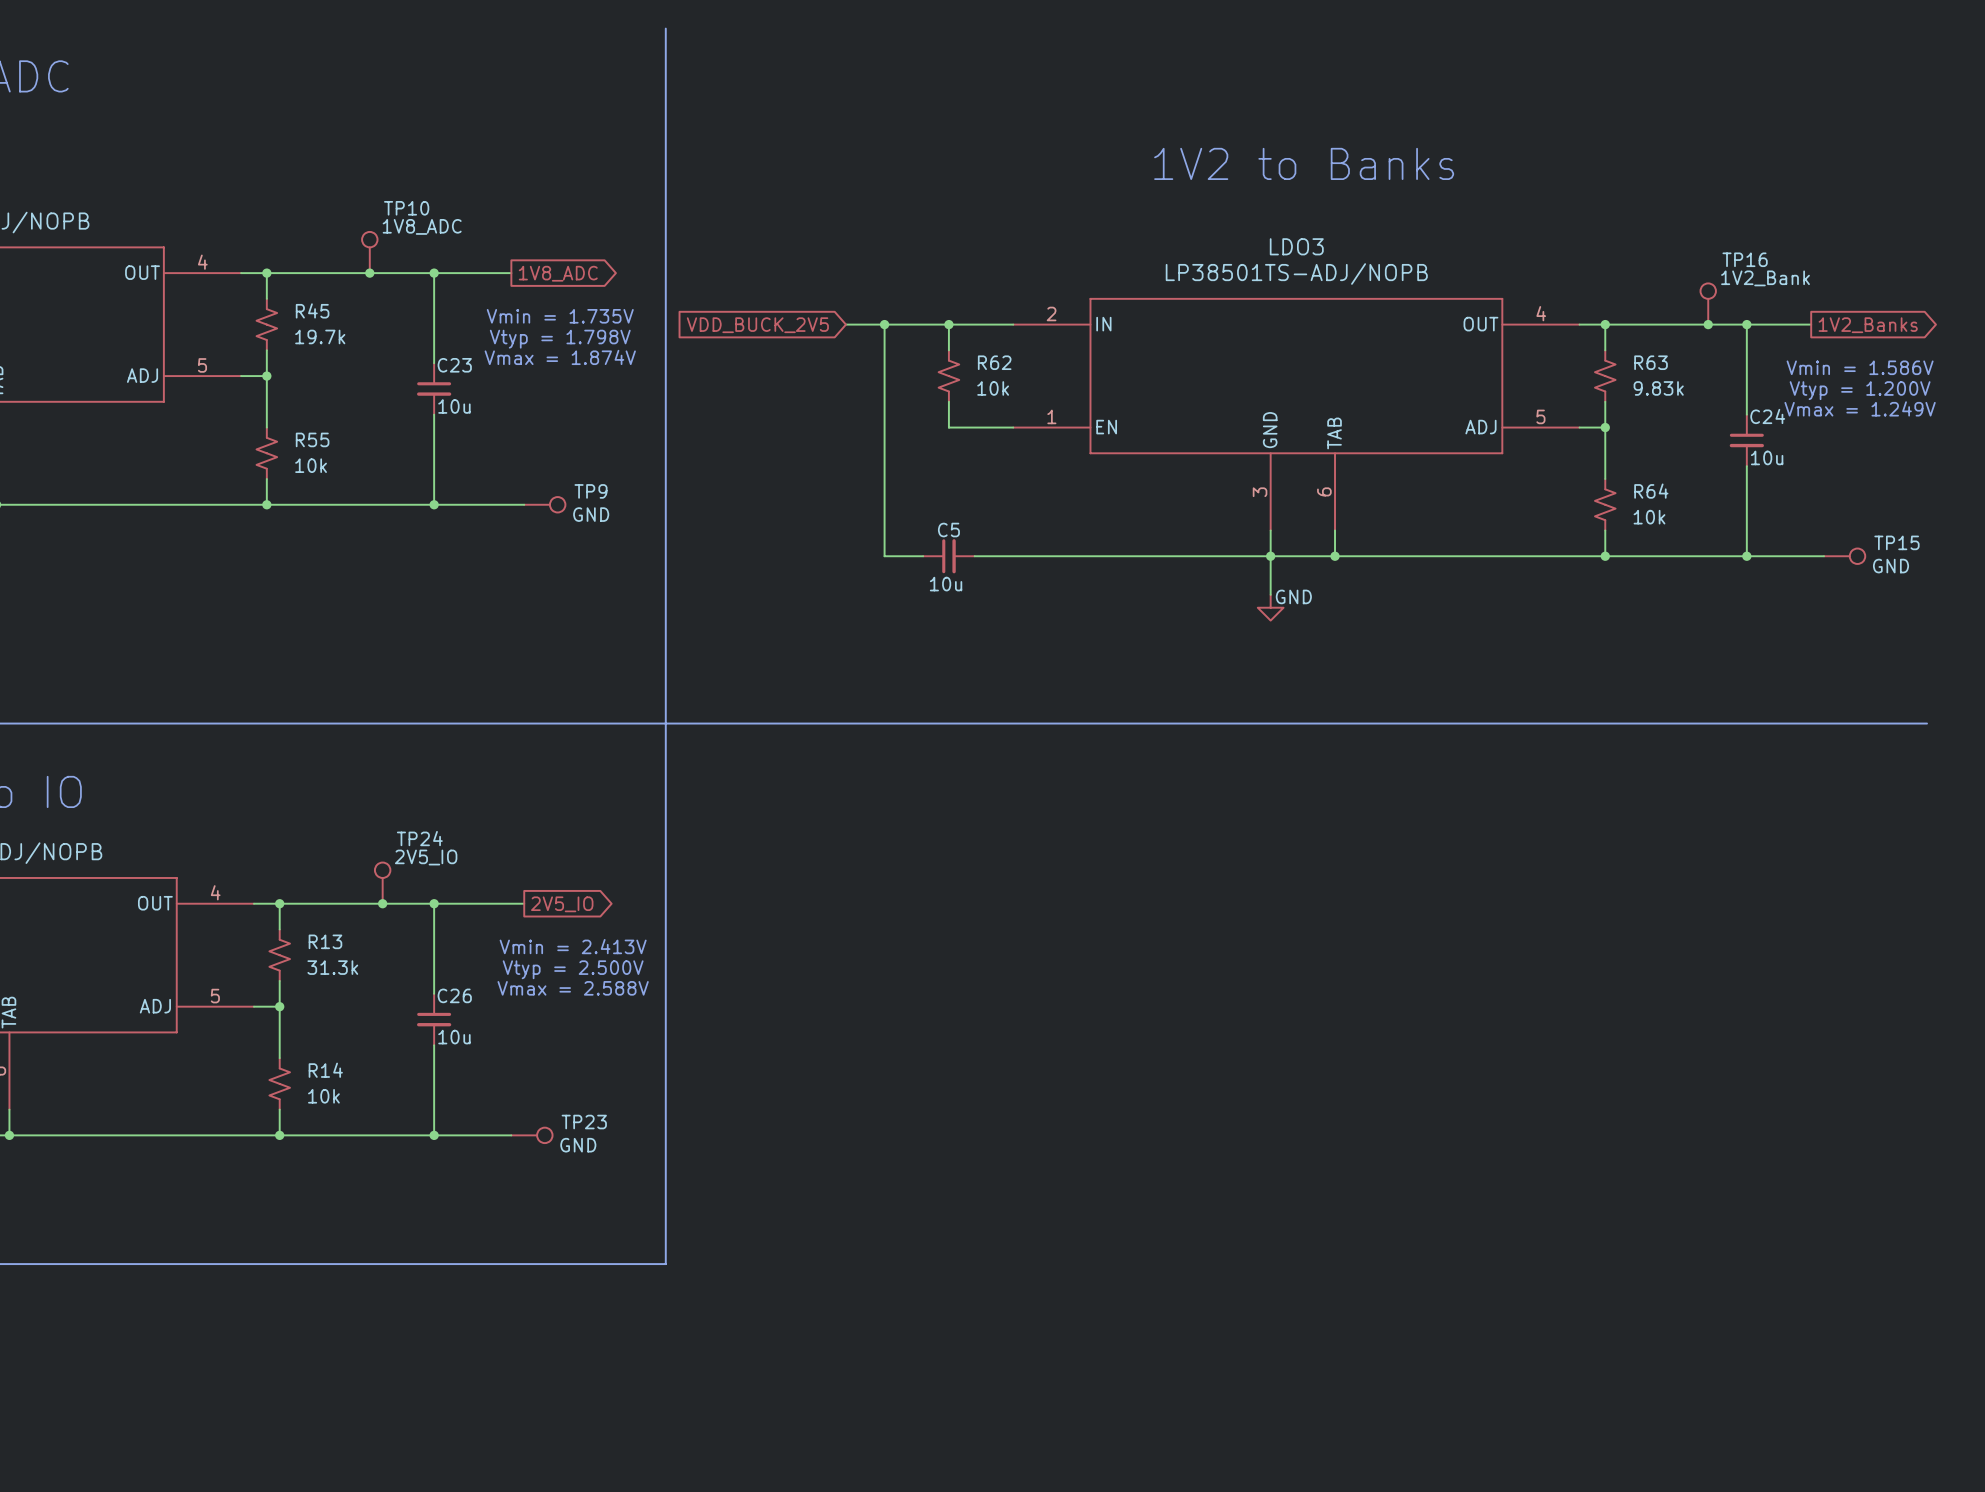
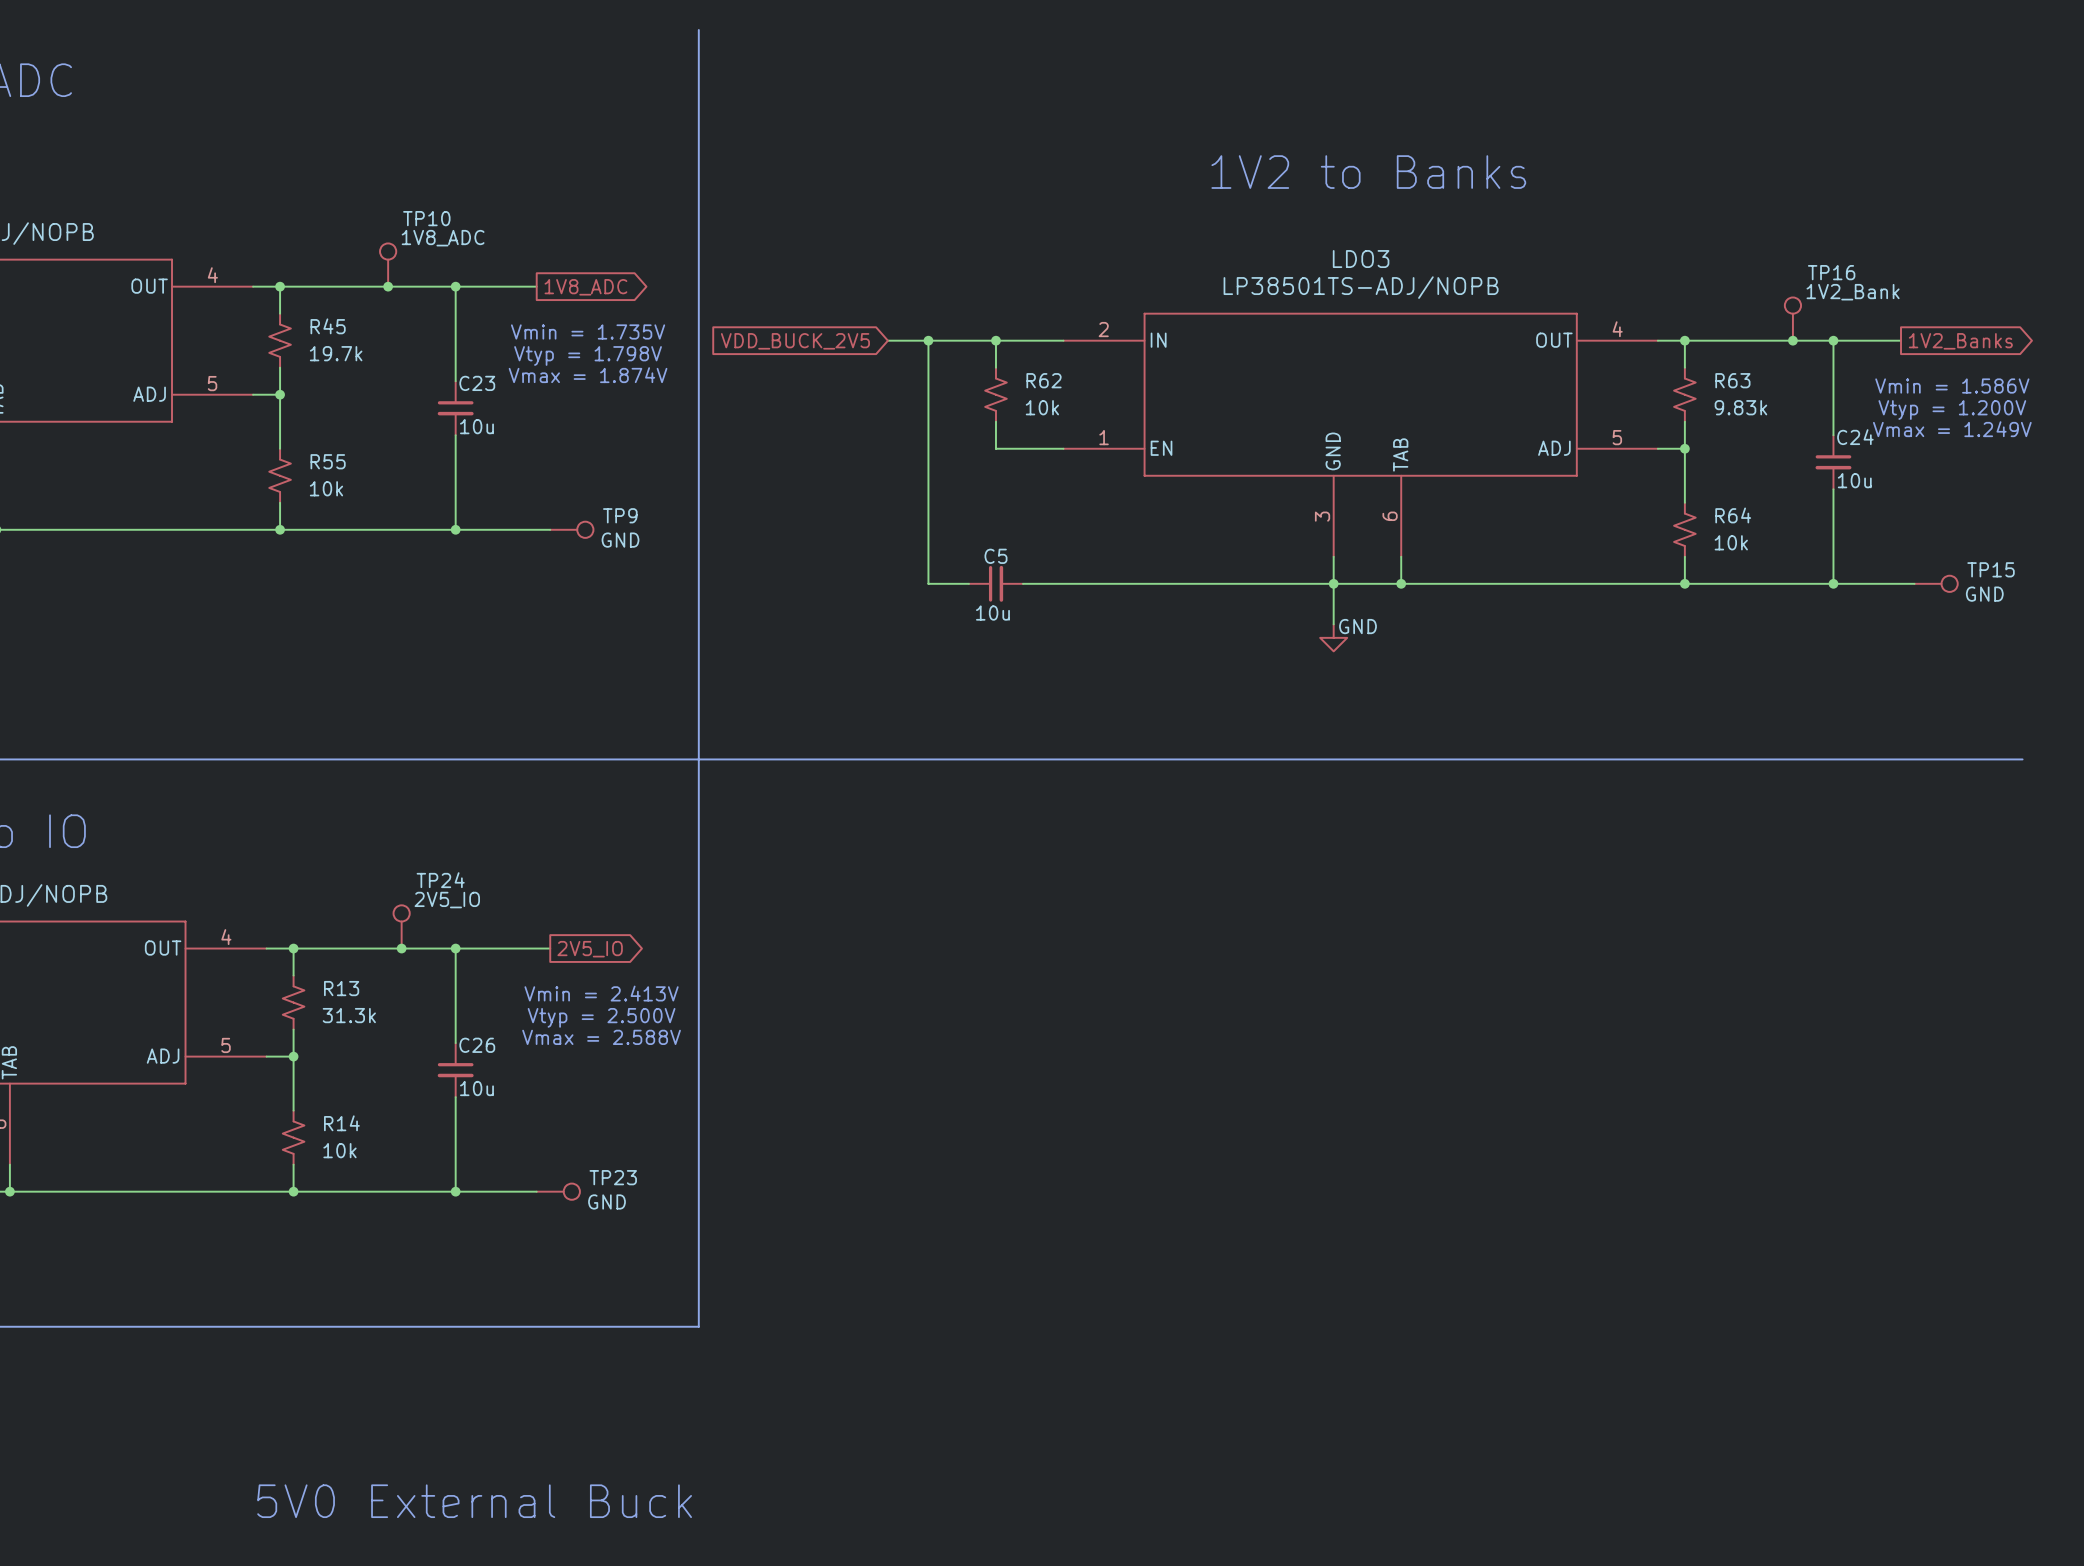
text: none -> 5V0 External Buck (474, 1501)

